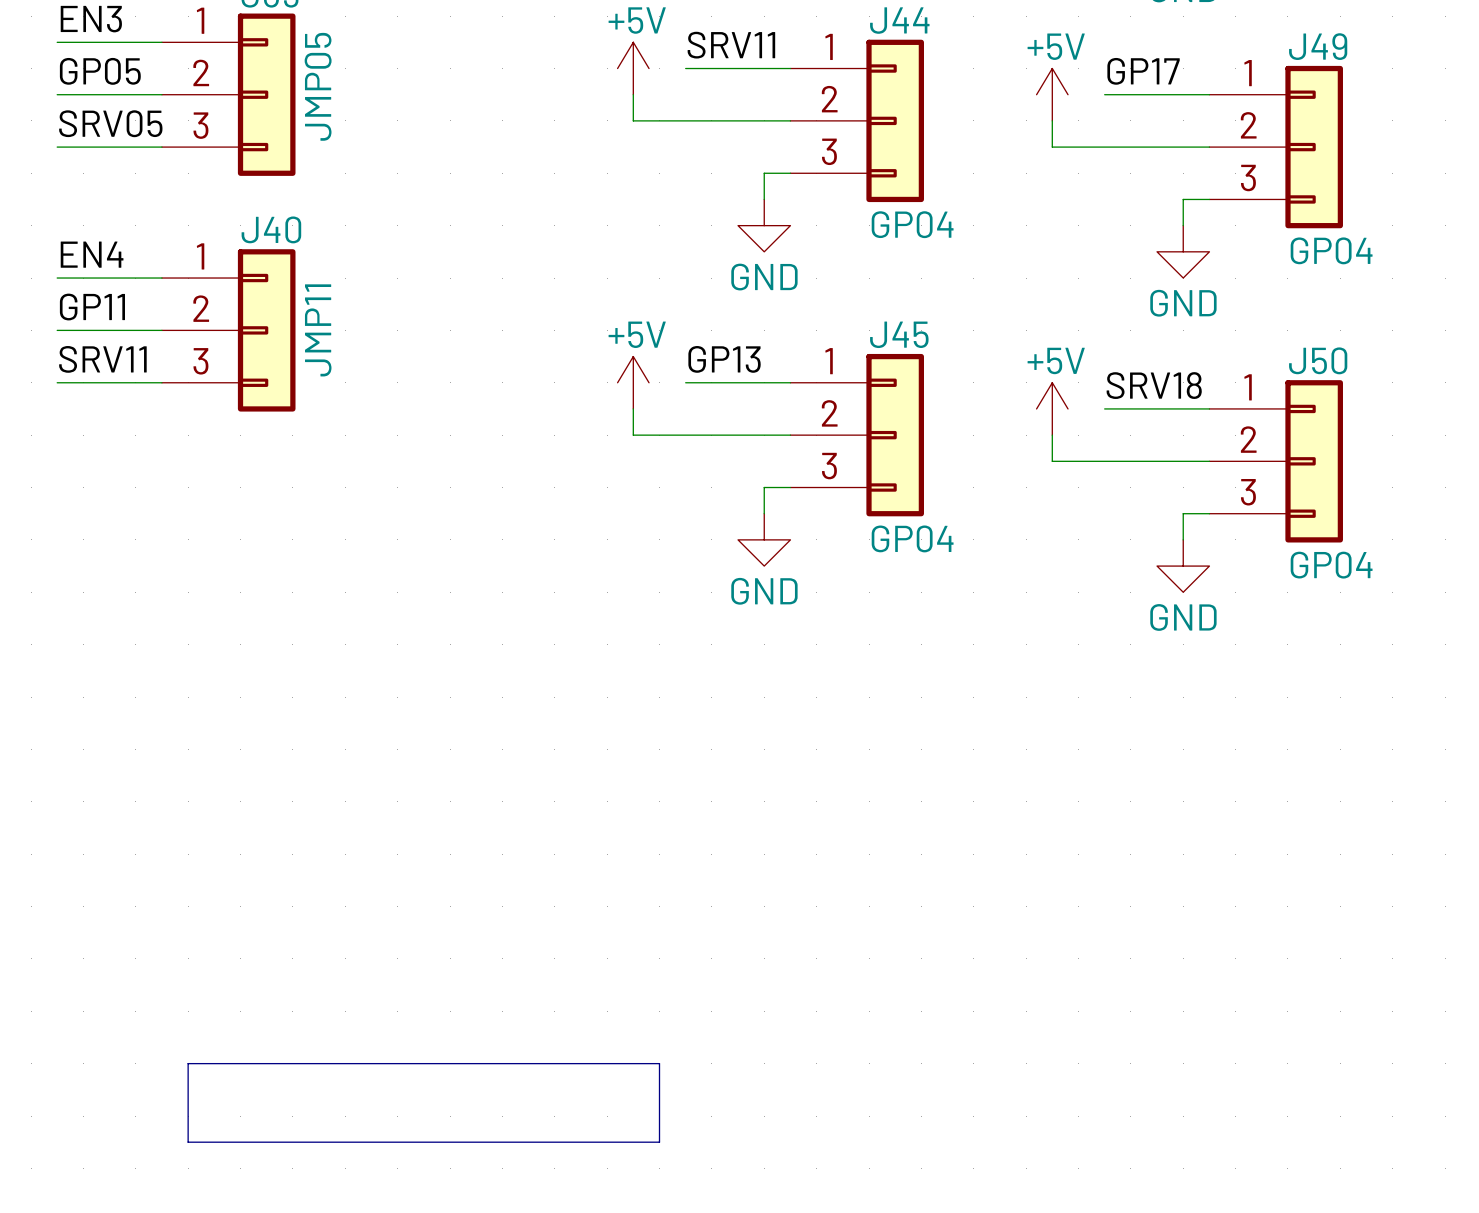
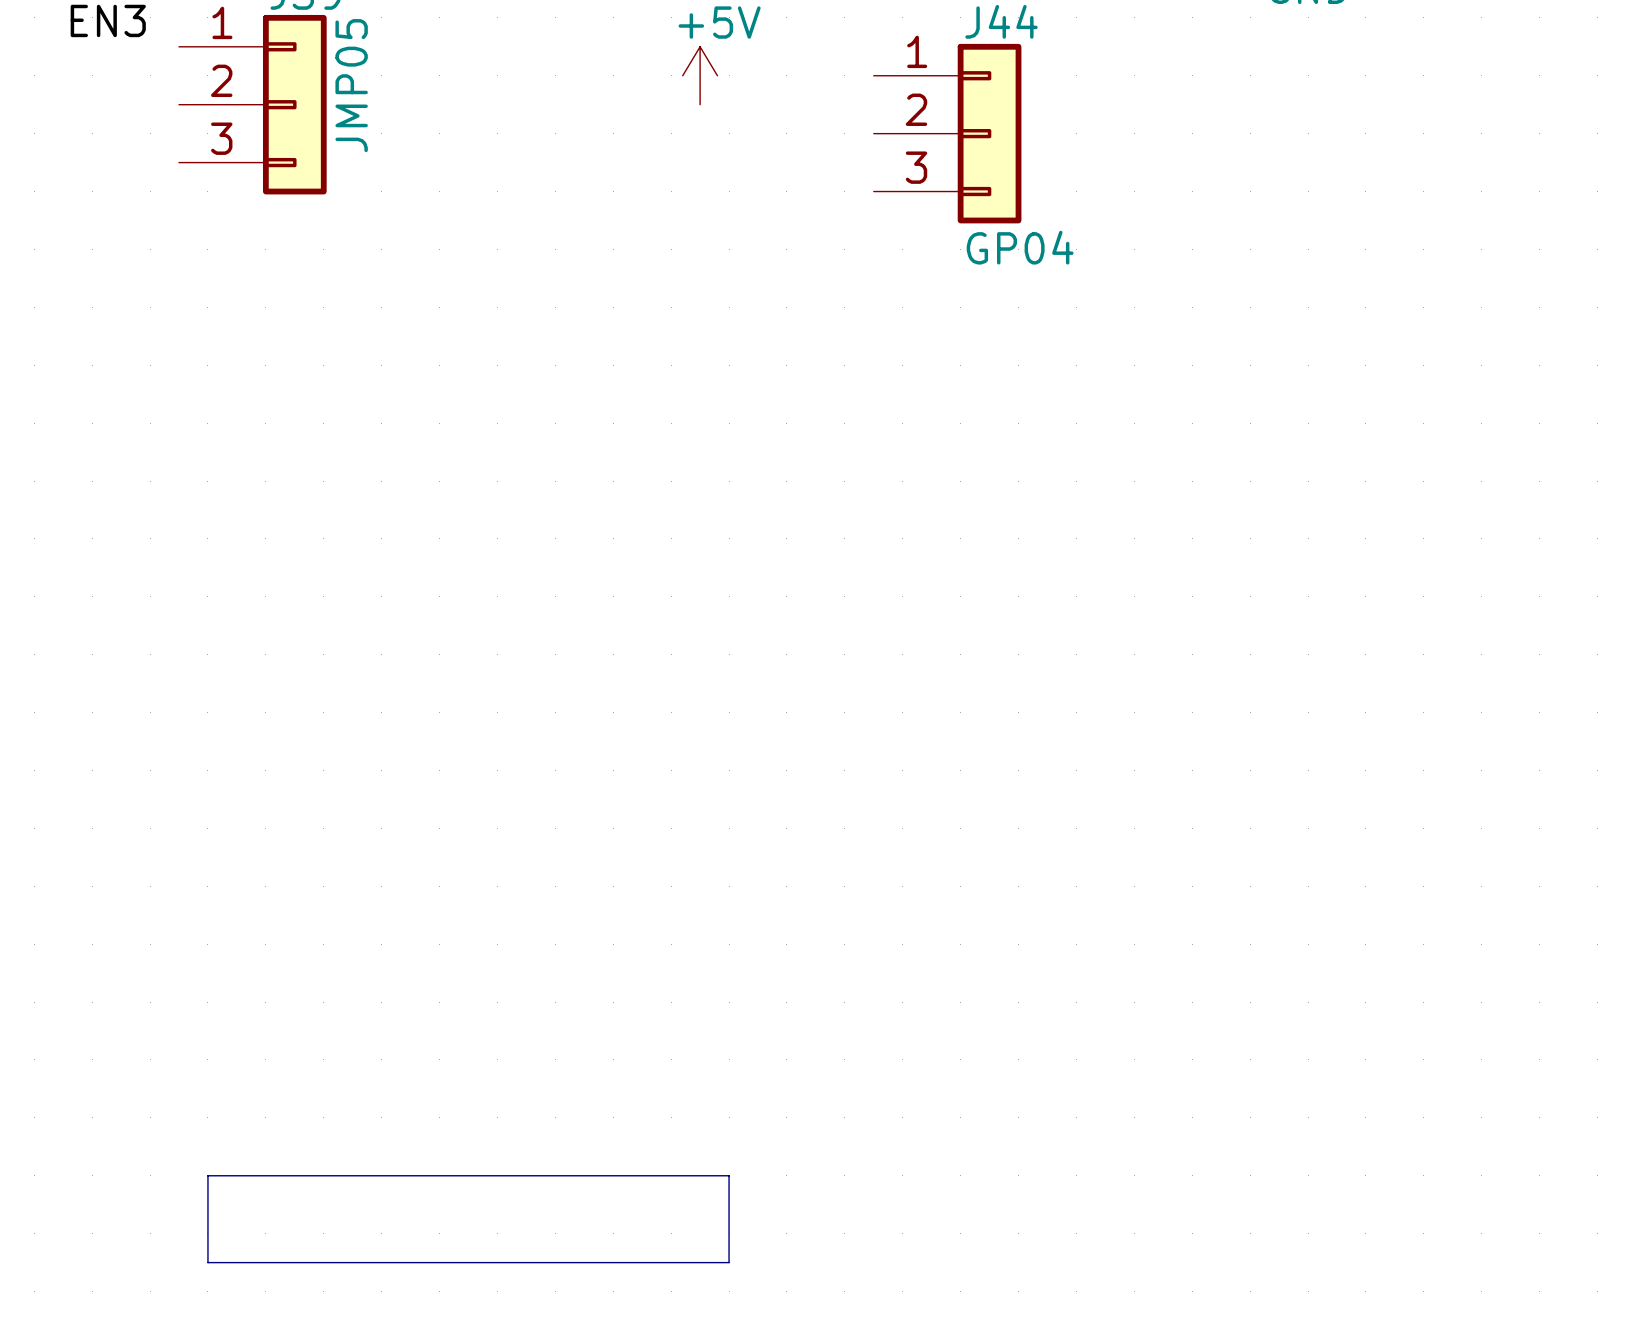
wire: (57, 42) (161, 42) -> none
label: SRV11 (731, 45) -> none
wire: (685, 68) (790, 68) -> none
label: GP05 (100, 71) -> none
label: GP17 (1143, 71) -> none
wire: (57, 94) (161, 94) -> none
wire: (633, 94) (633, 120) (790, 120) -> none
power symbol: +5V (1052, 94) -> none
wire: (1104, 94) (1209, 94) -> none
wire: (1052, 120) (1052, 147) (1209, 147) -> none
label: SRV05 (110, 123) -> none
wire: (57, 147) (161, 147) -> none
J49: GP04 (1276, 147) -> none
wire: (790, 173) (764, 173) (764, 199) -> none
wire: (1209, 199) (1183, 199) (1183, 225) -> none
power symbol: GND (764, 225) -> none
power symbol: GND (1183, 251) -> none
label: EN4 (92, 254) -> none
wire: (57, 278) (161, 278) -> none
label: GP11 (92, 307) -> none
wire: (57, 330) (161, 330) -> none
J40: JMP11 (228, 330) -> none
label: SRV11 (102, 359) -> none
label: GP13 (724, 359) -> none
wire: (57, 382) (161, 382) -> none
power symbol: +5V (633, 382) -> none
wire: (685, 382) (790, 382) -> none
label: SRV18 (1154, 385) -> none
wire: (633, 408) (633, 435) (790, 435) -> none
power symbol: +5V (1052, 408) -> none
wire: (1104, 408) (1209, 408) -> none
J45: GP04 (857, 435) -> none
wire: (1052, 435) (1052, 461) (1209, 461) -> none
J50: GP04 (1276, 461) -> none
wire: (790, 487) (764, 487) (764, 513) -> none
wire: (1209, 513) (1183, 513) (1183, 539) -> none
power symbol: GND (764, 539) -> none
power symbol: GND (1183, 566) -> none

